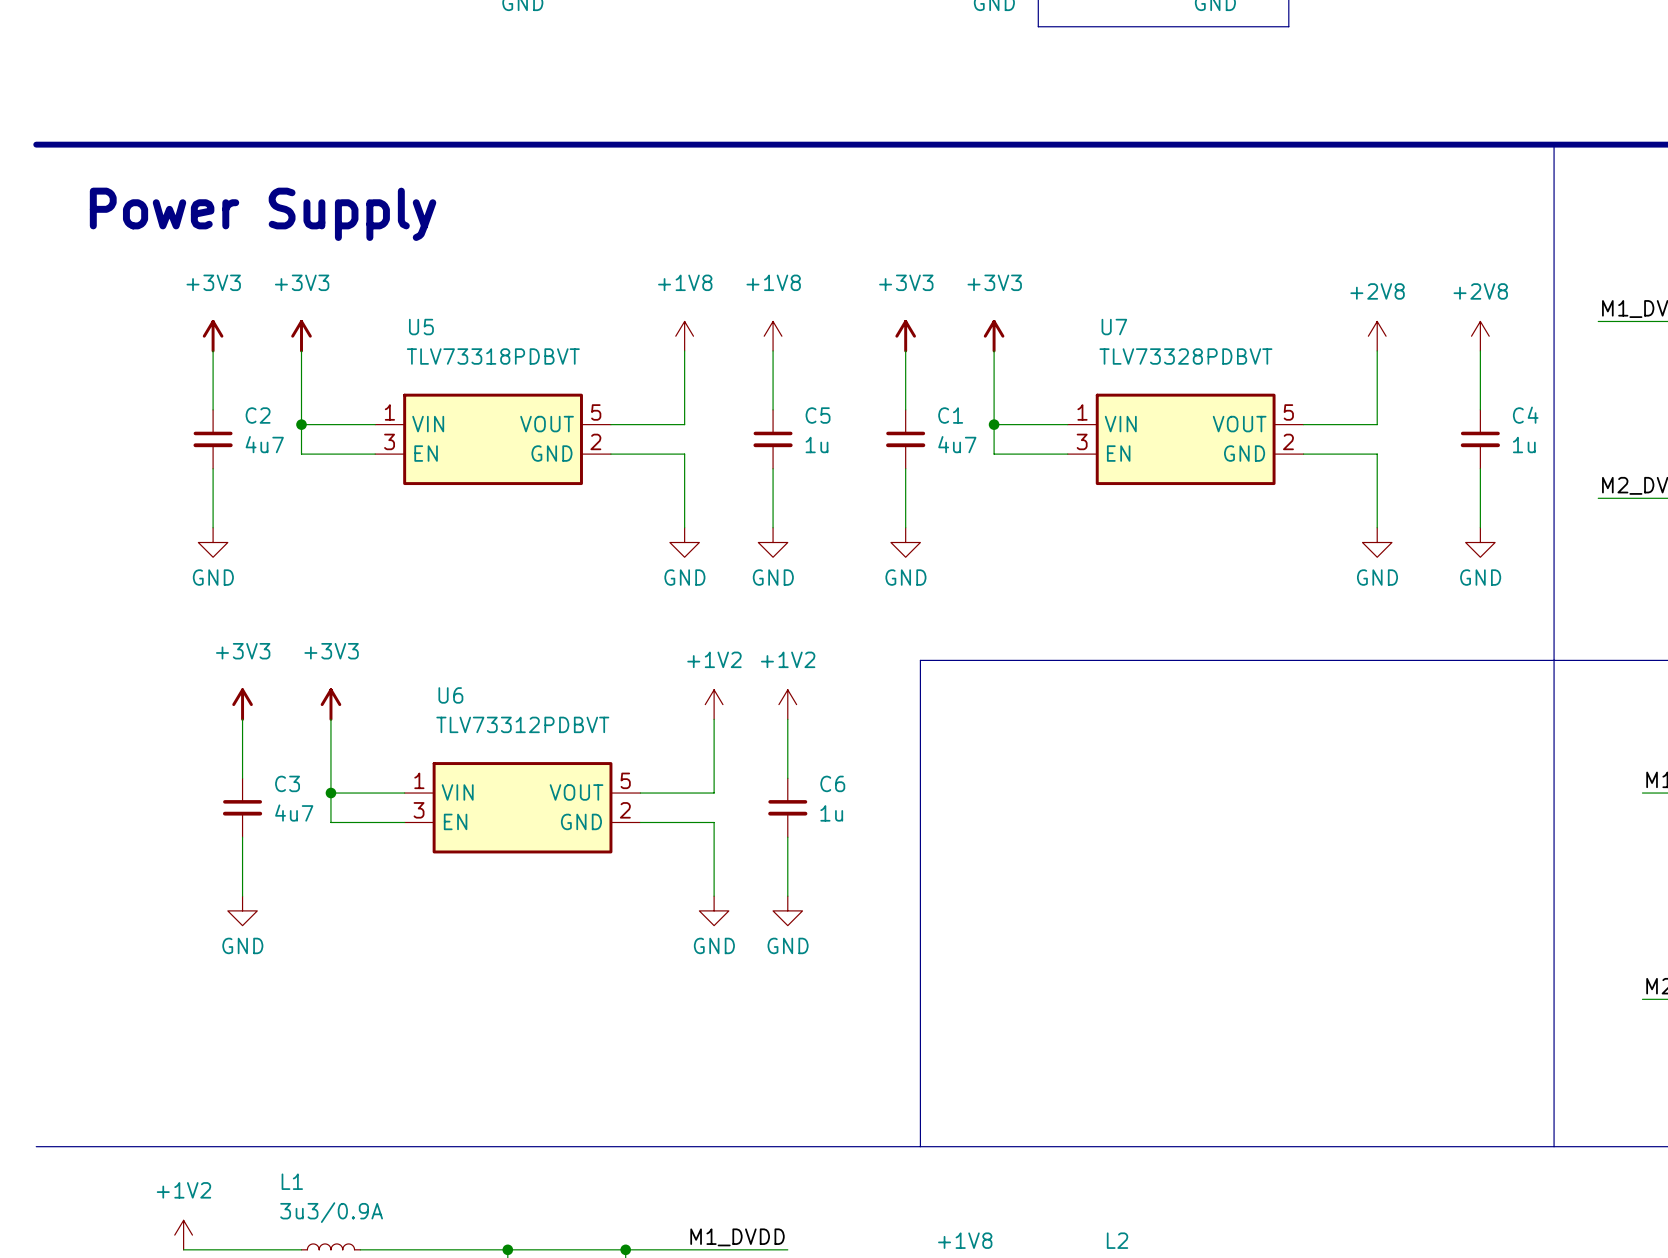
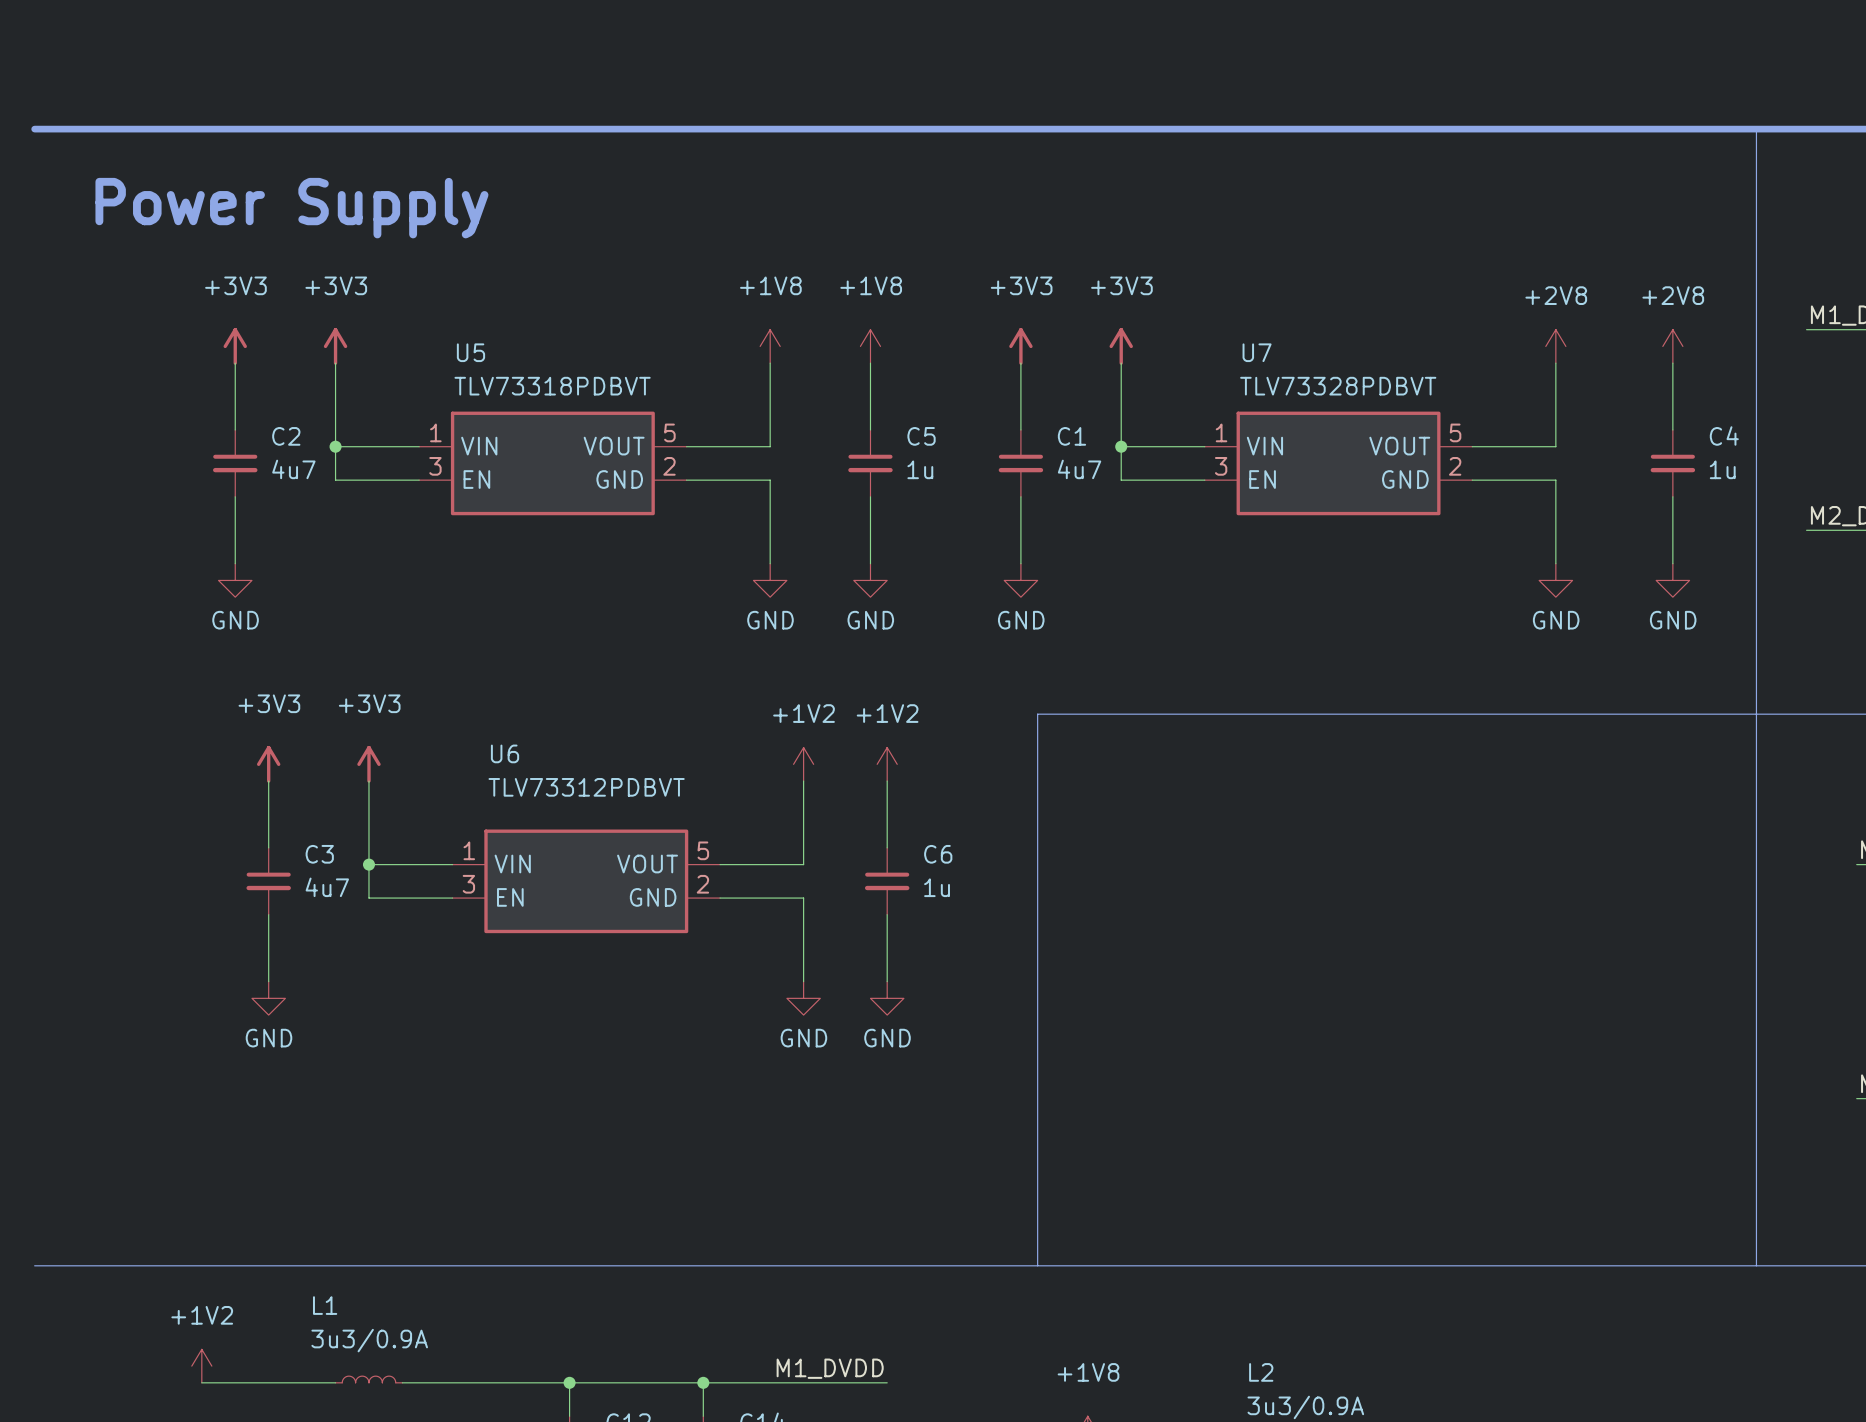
U5 name position: U5 (421, 327) -> U5 (470, 352)
U7 name position: U7 (1114, 327) -> U7 (1257, 352)
U5 text position: TLV73318PDBVT (493, 356) -> TLV73318PDBVT (552, 386)
U7 text position: TLV73328PDBVT (1185, 356) -> TLV73328PDBVT (1338, 386)

